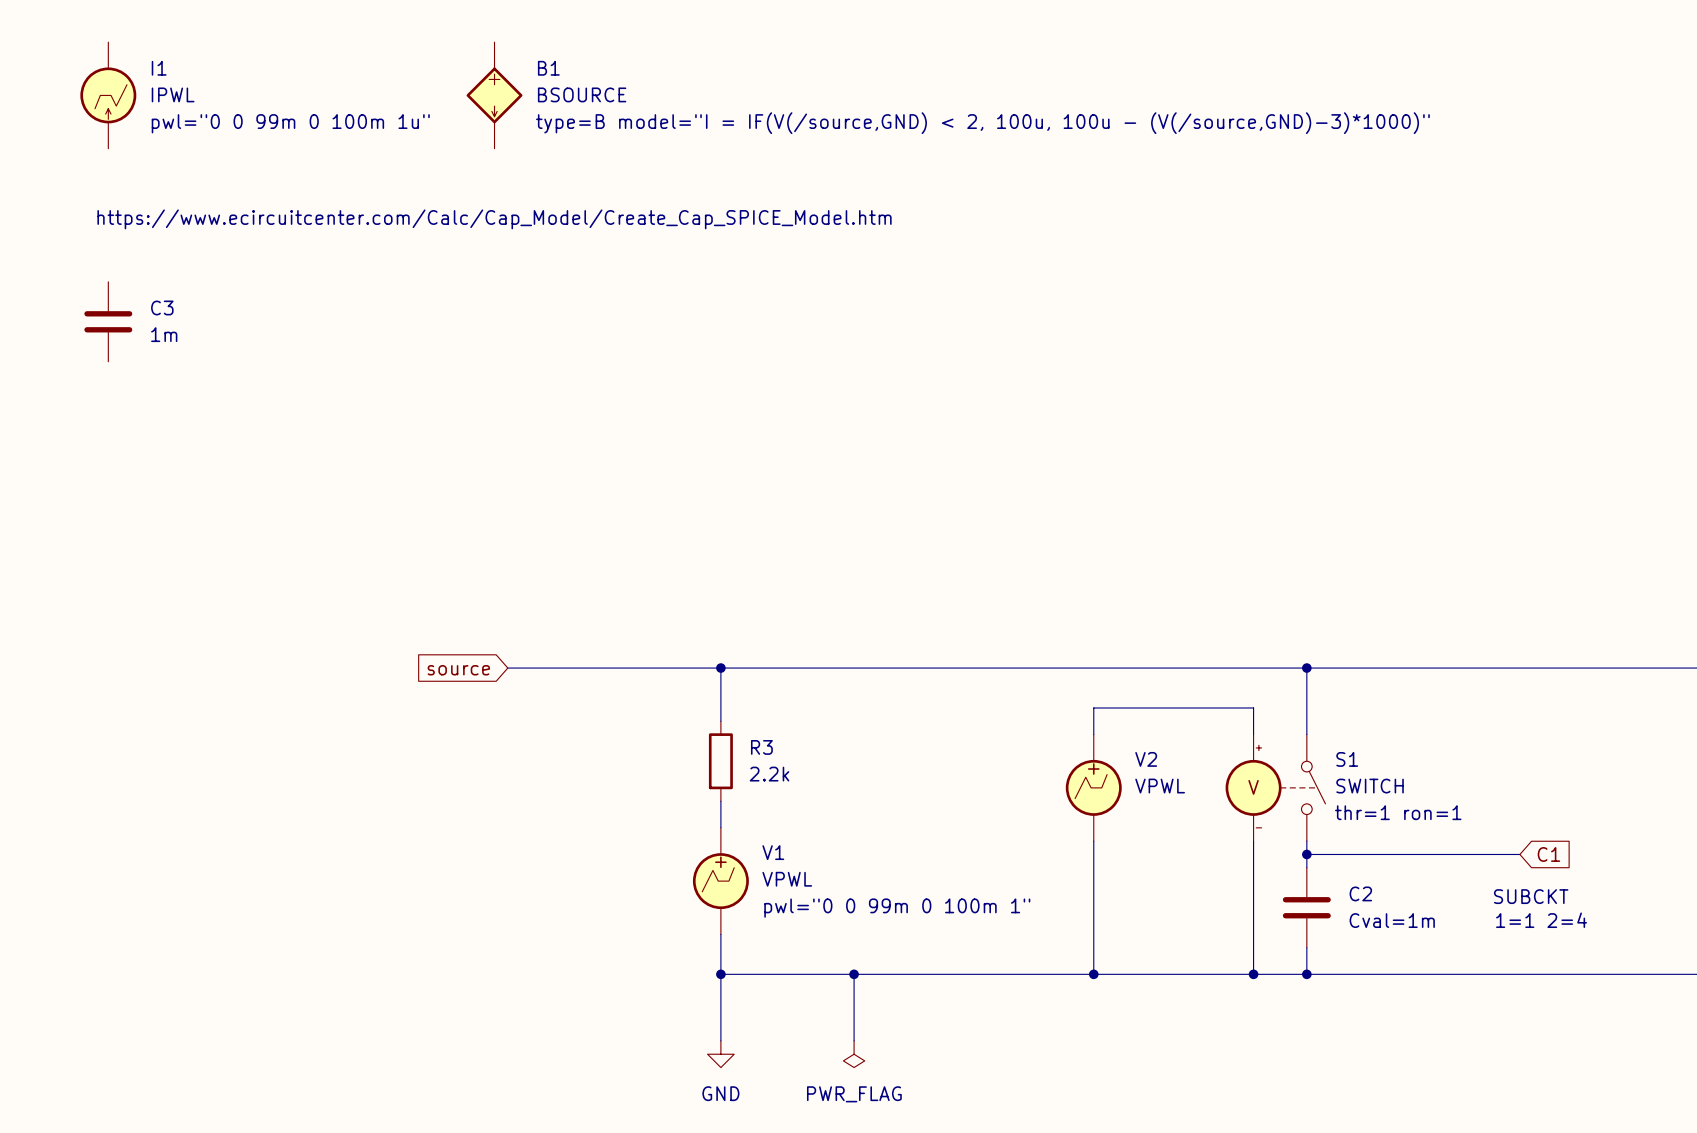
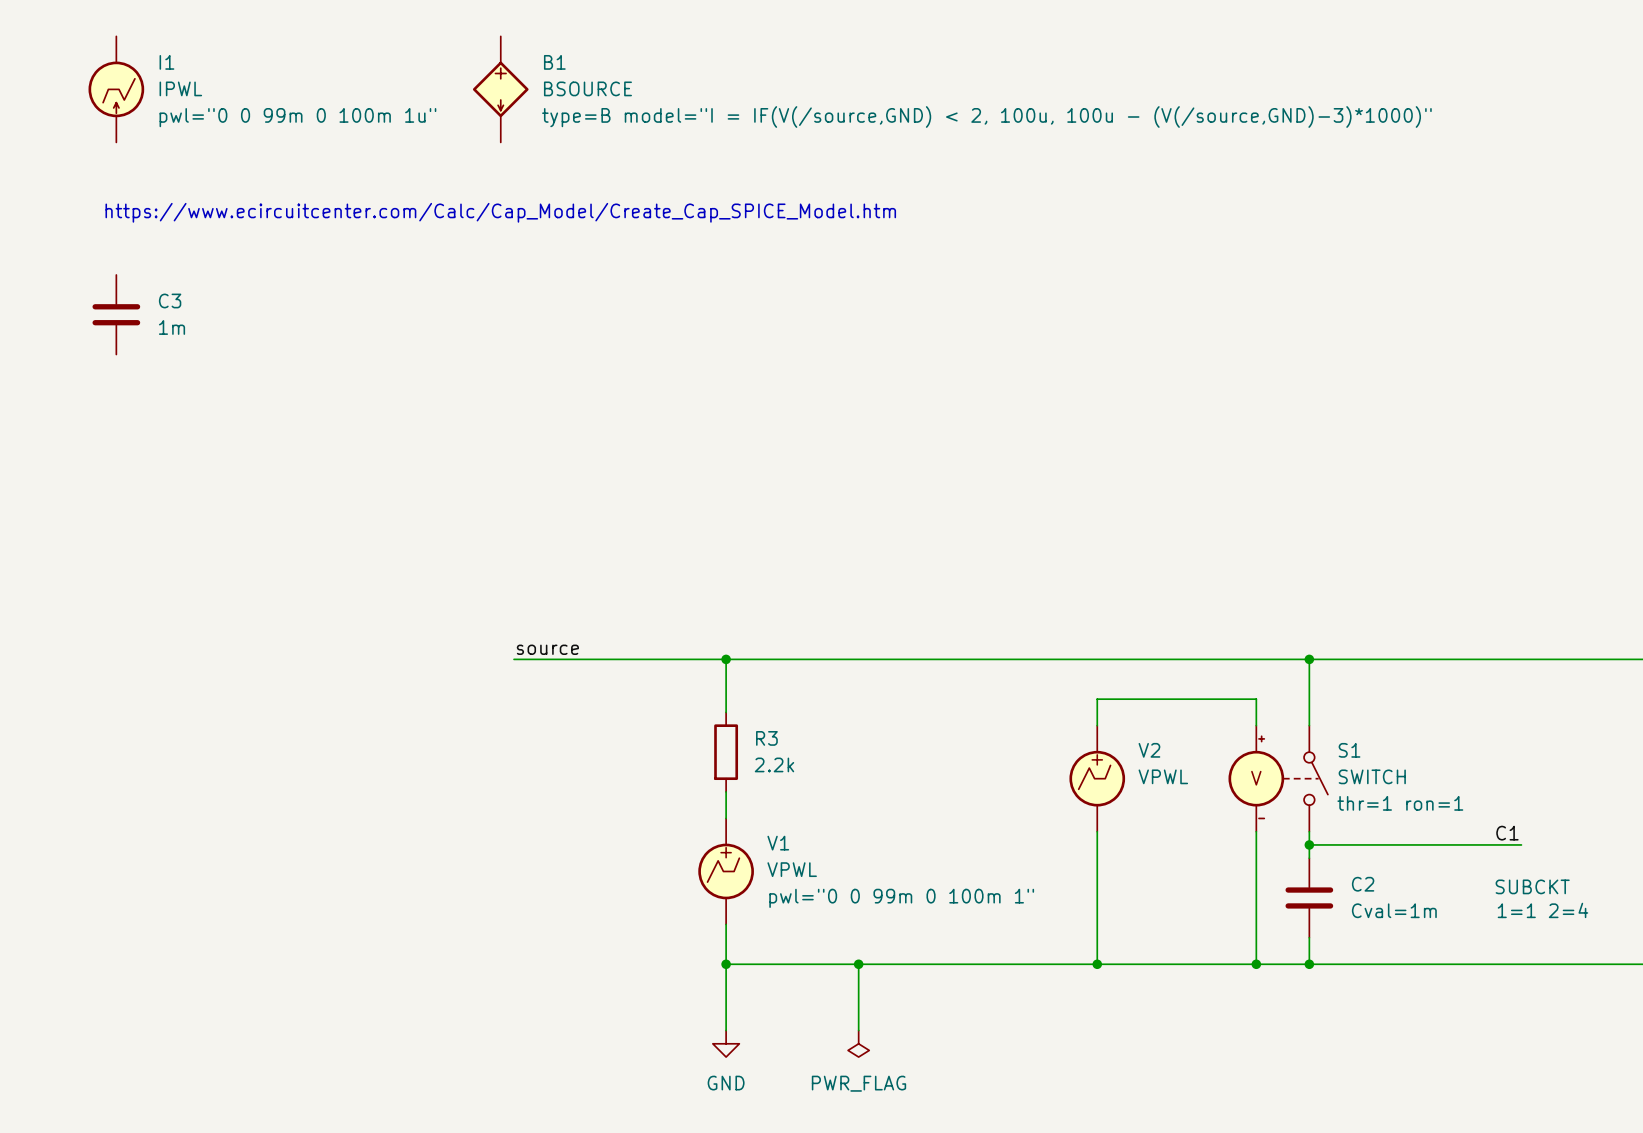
label: none -> source (547, 649)
global label: source (458, 670) -> none
label: none -> C1 (1507, 833)
global label: C1 (1548, 854) -> none

